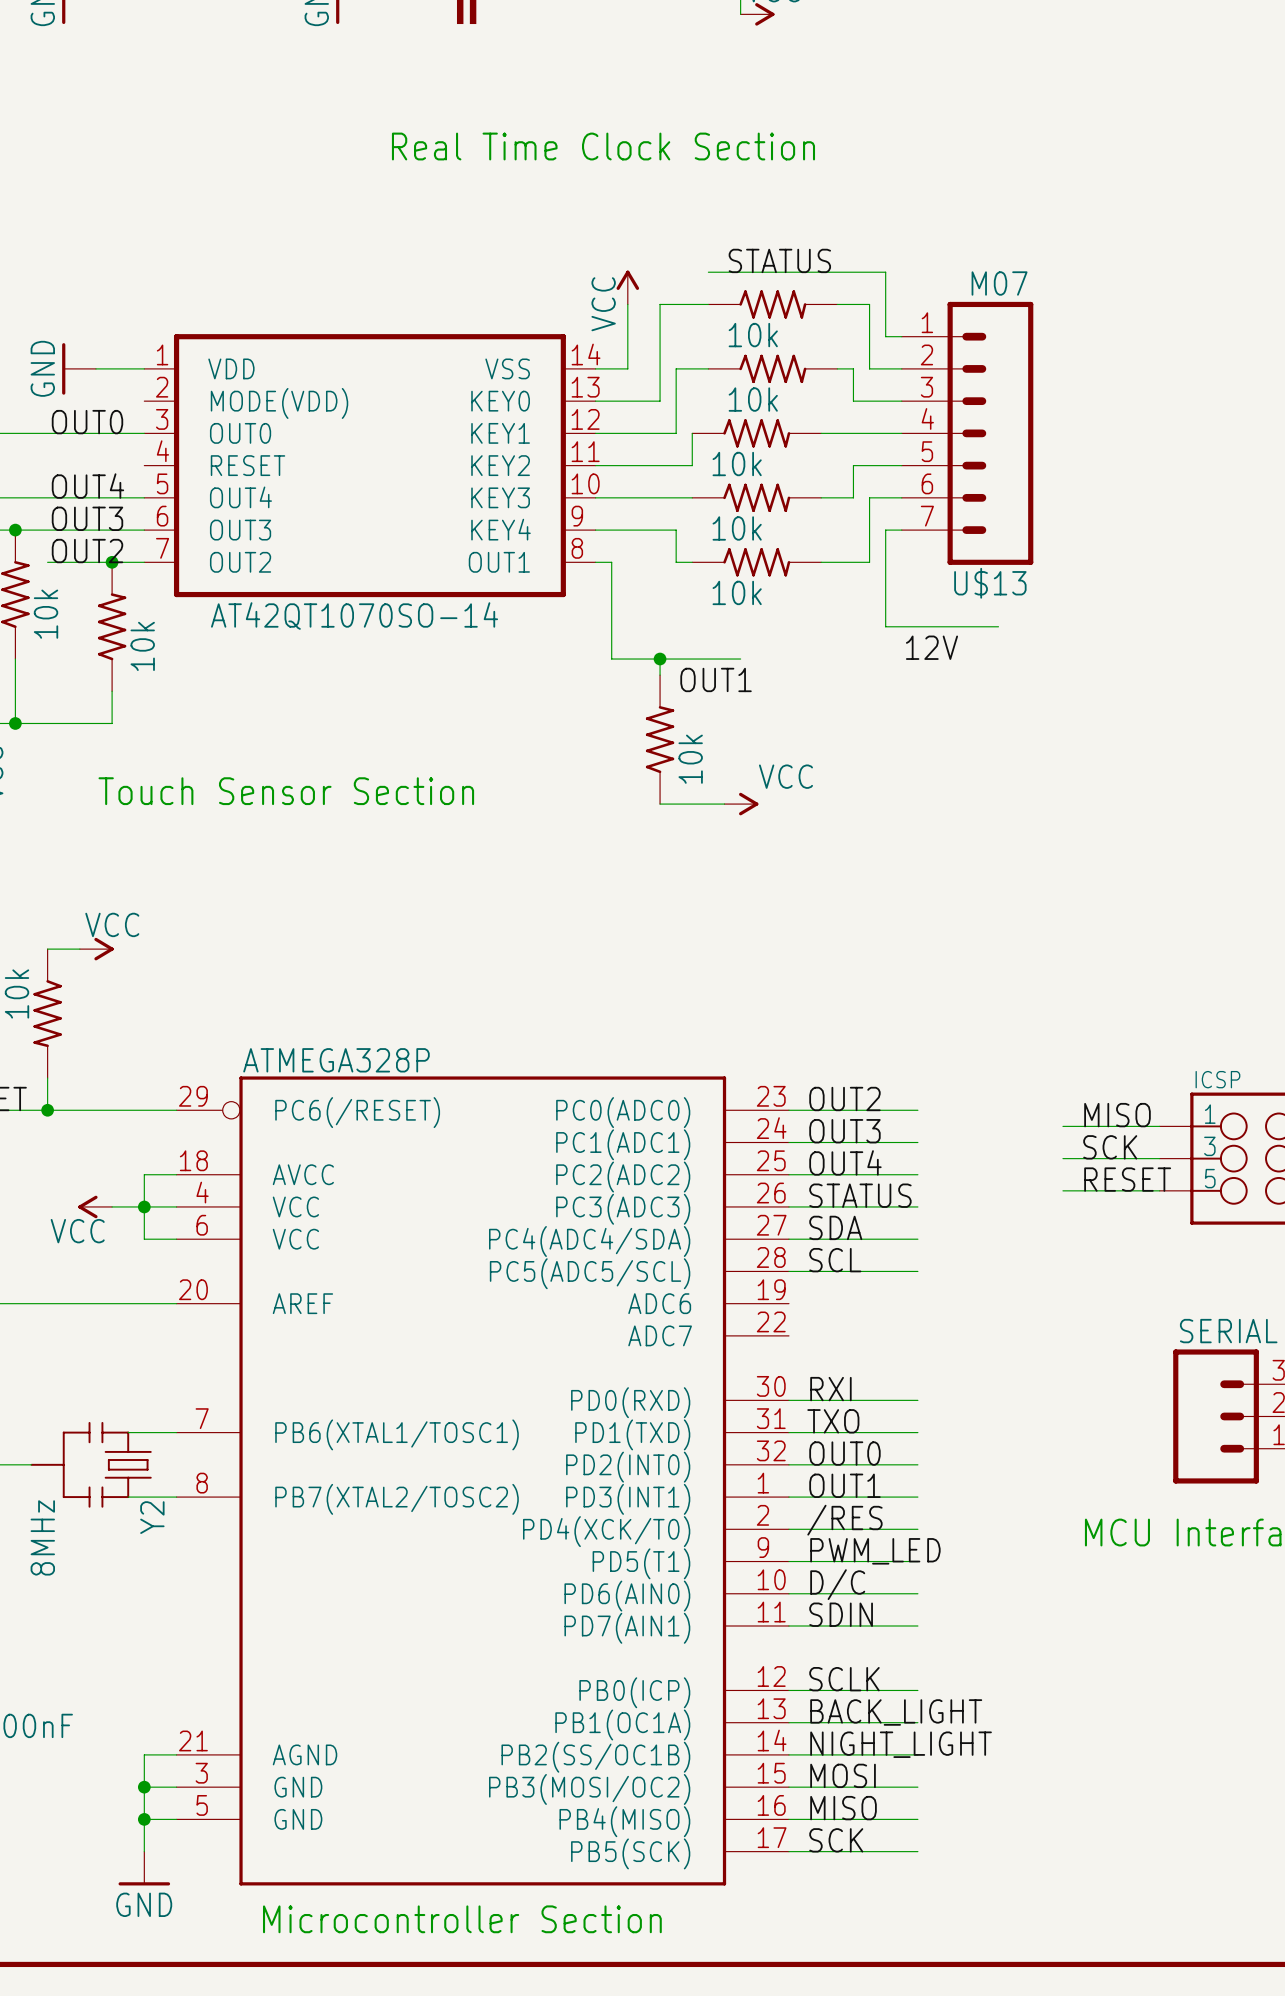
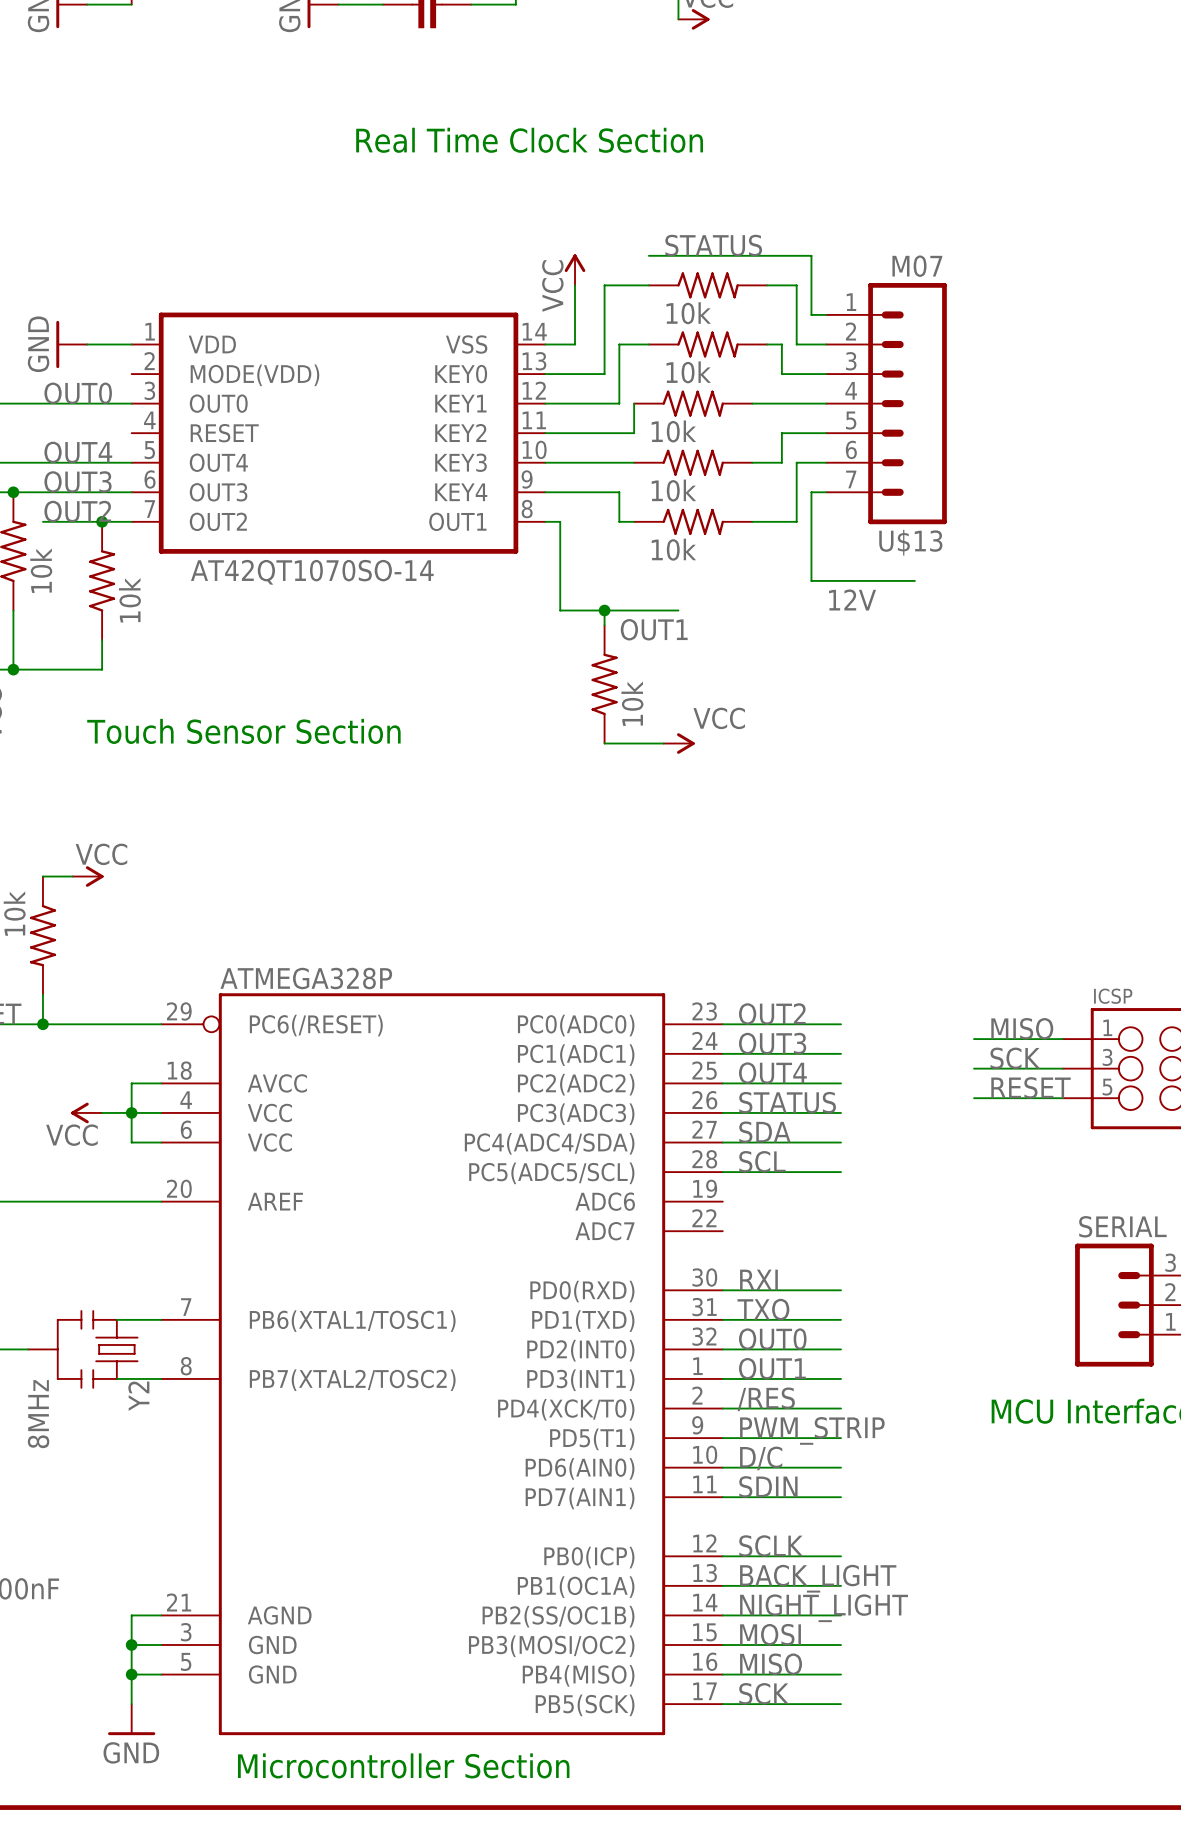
label: PWM_LED (875, 1551) -> PWM_STRIP (812, 1430)

